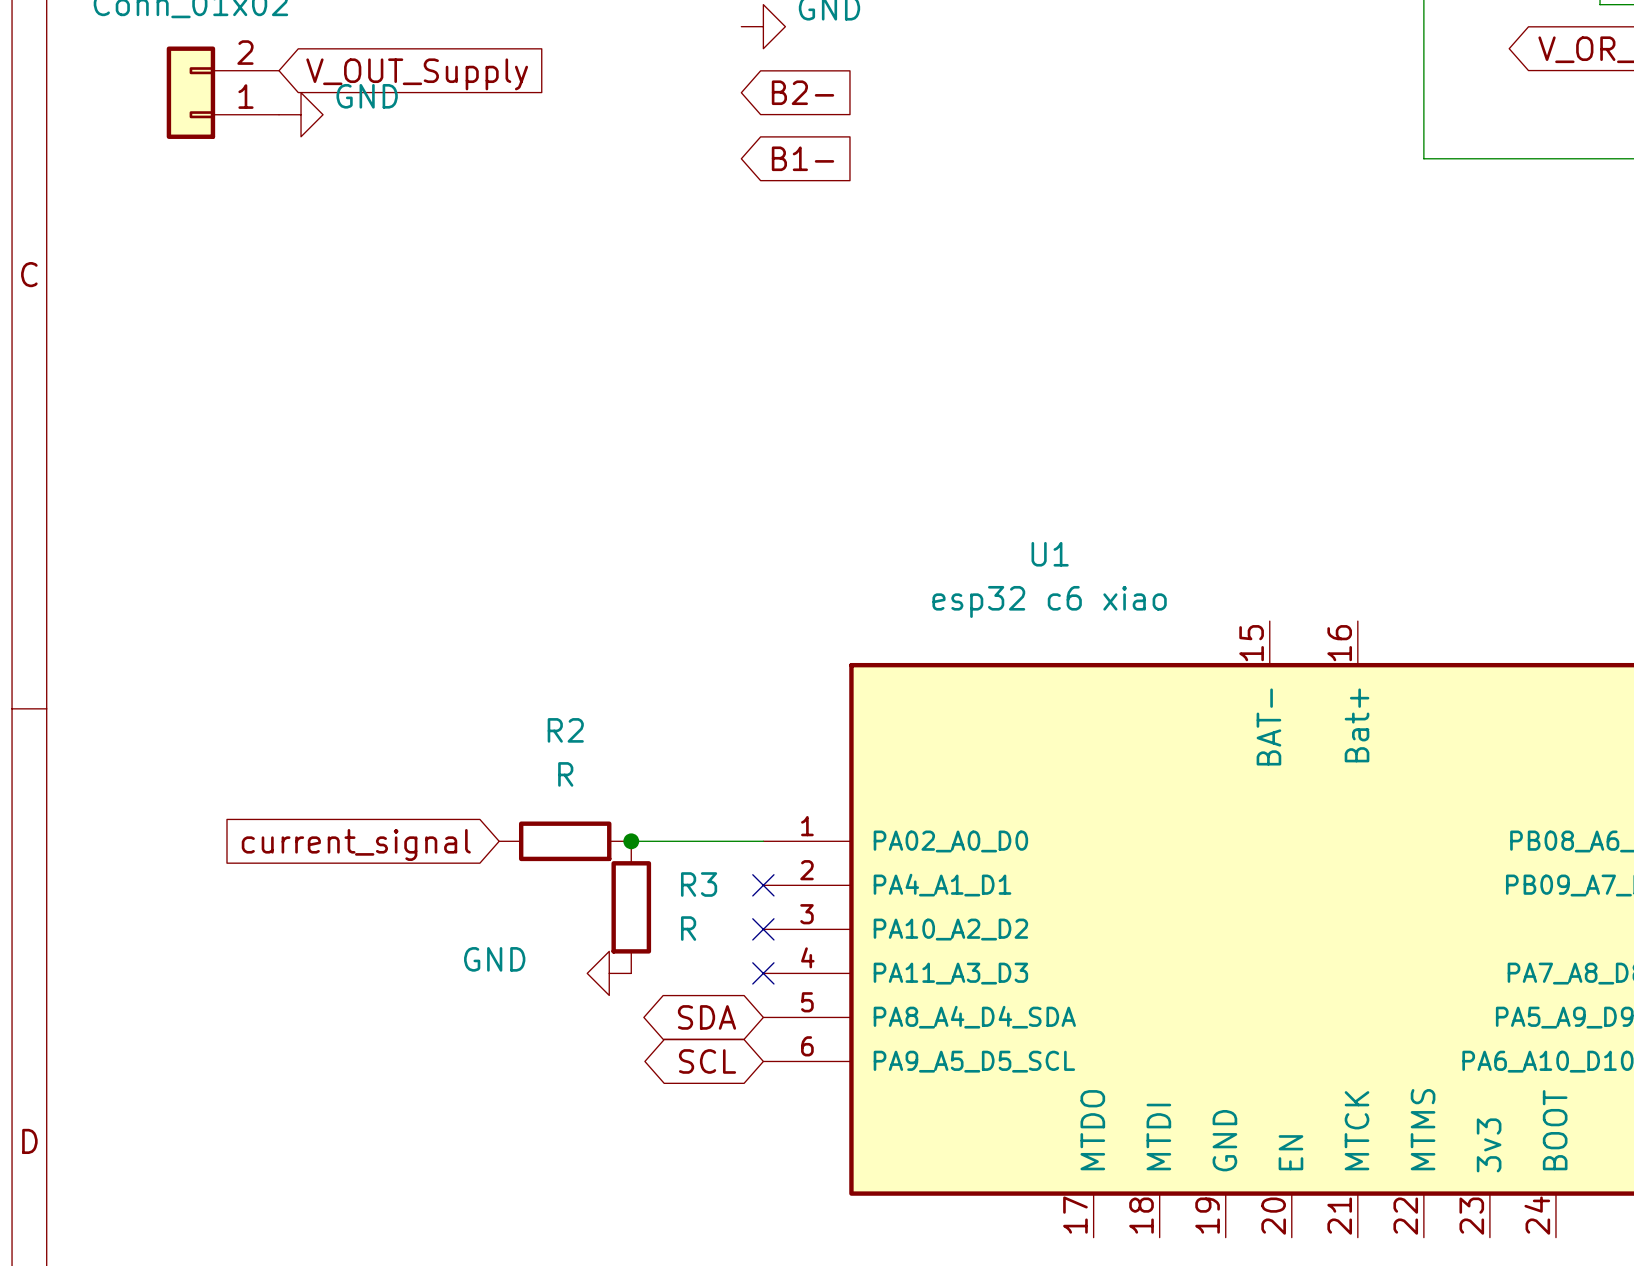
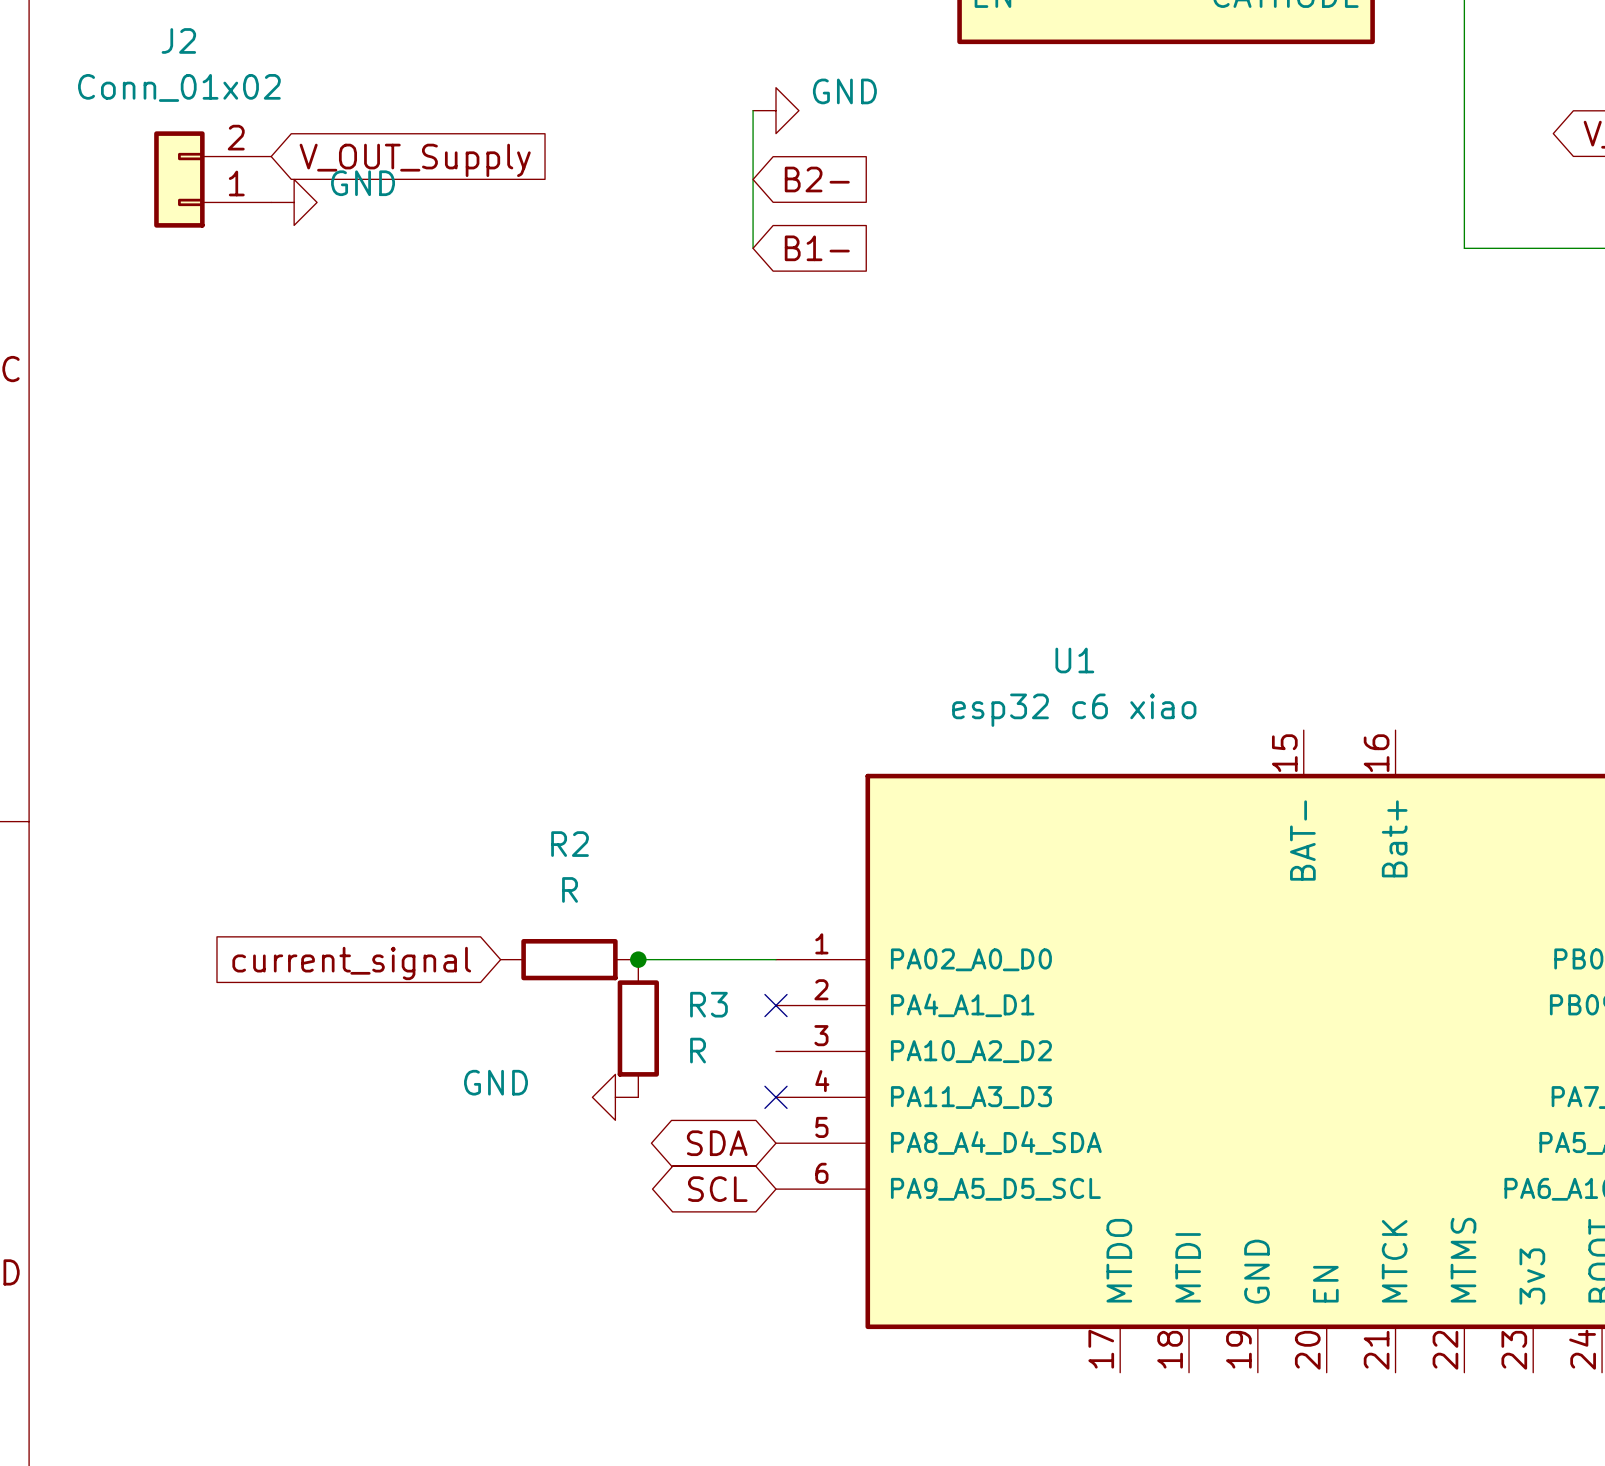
wire: none -> (753, 110) (753, 248)
no-connect mark: (763, 929) -> none

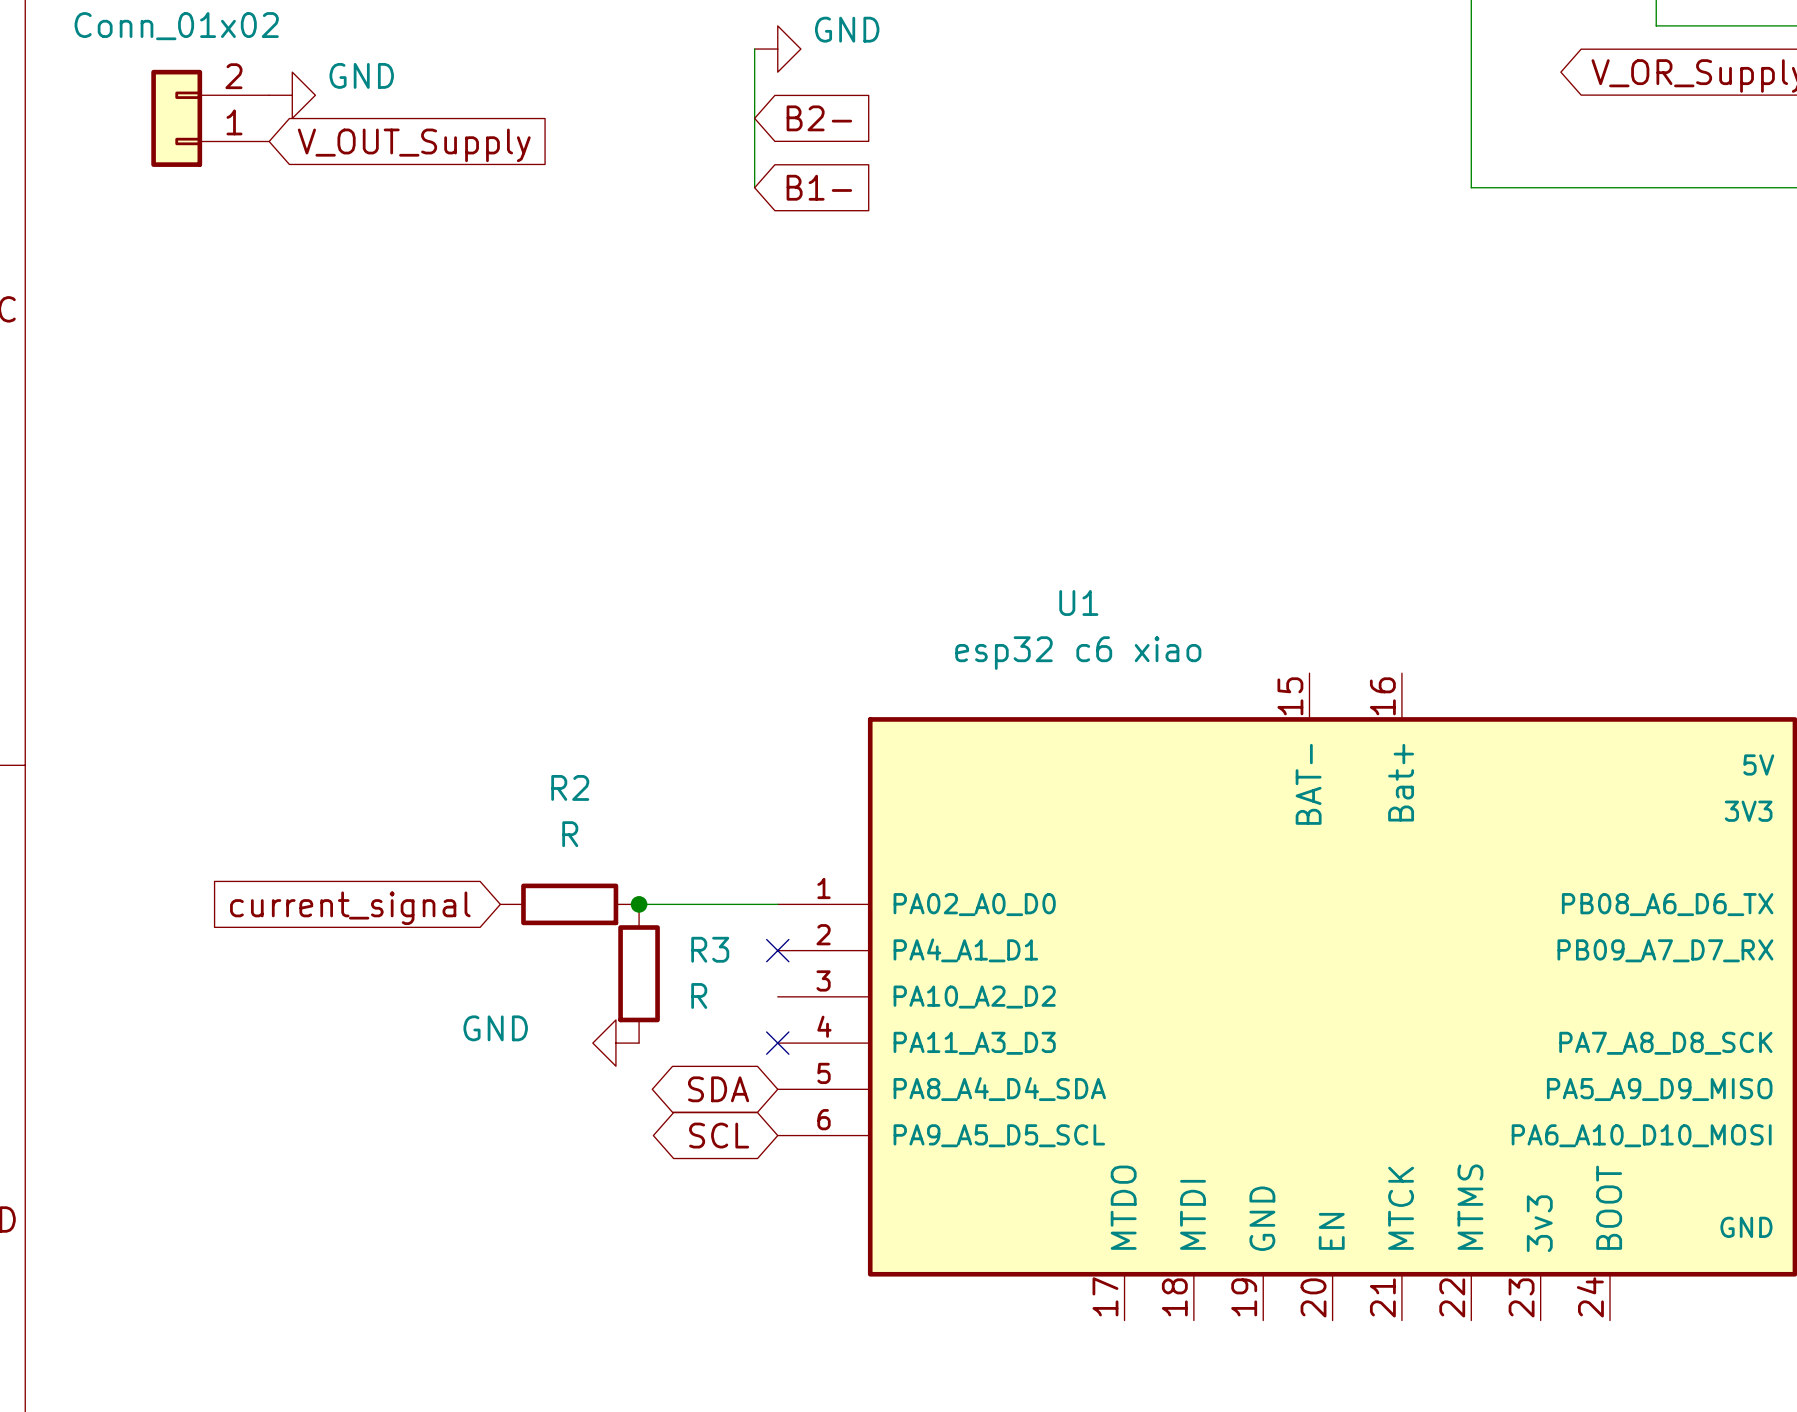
global label position: V_OUT_Supply (415, 160) -> V_OUT_Supply (414, 145)
power symbol position: GND (294, 202) -> GND (292, 95)

